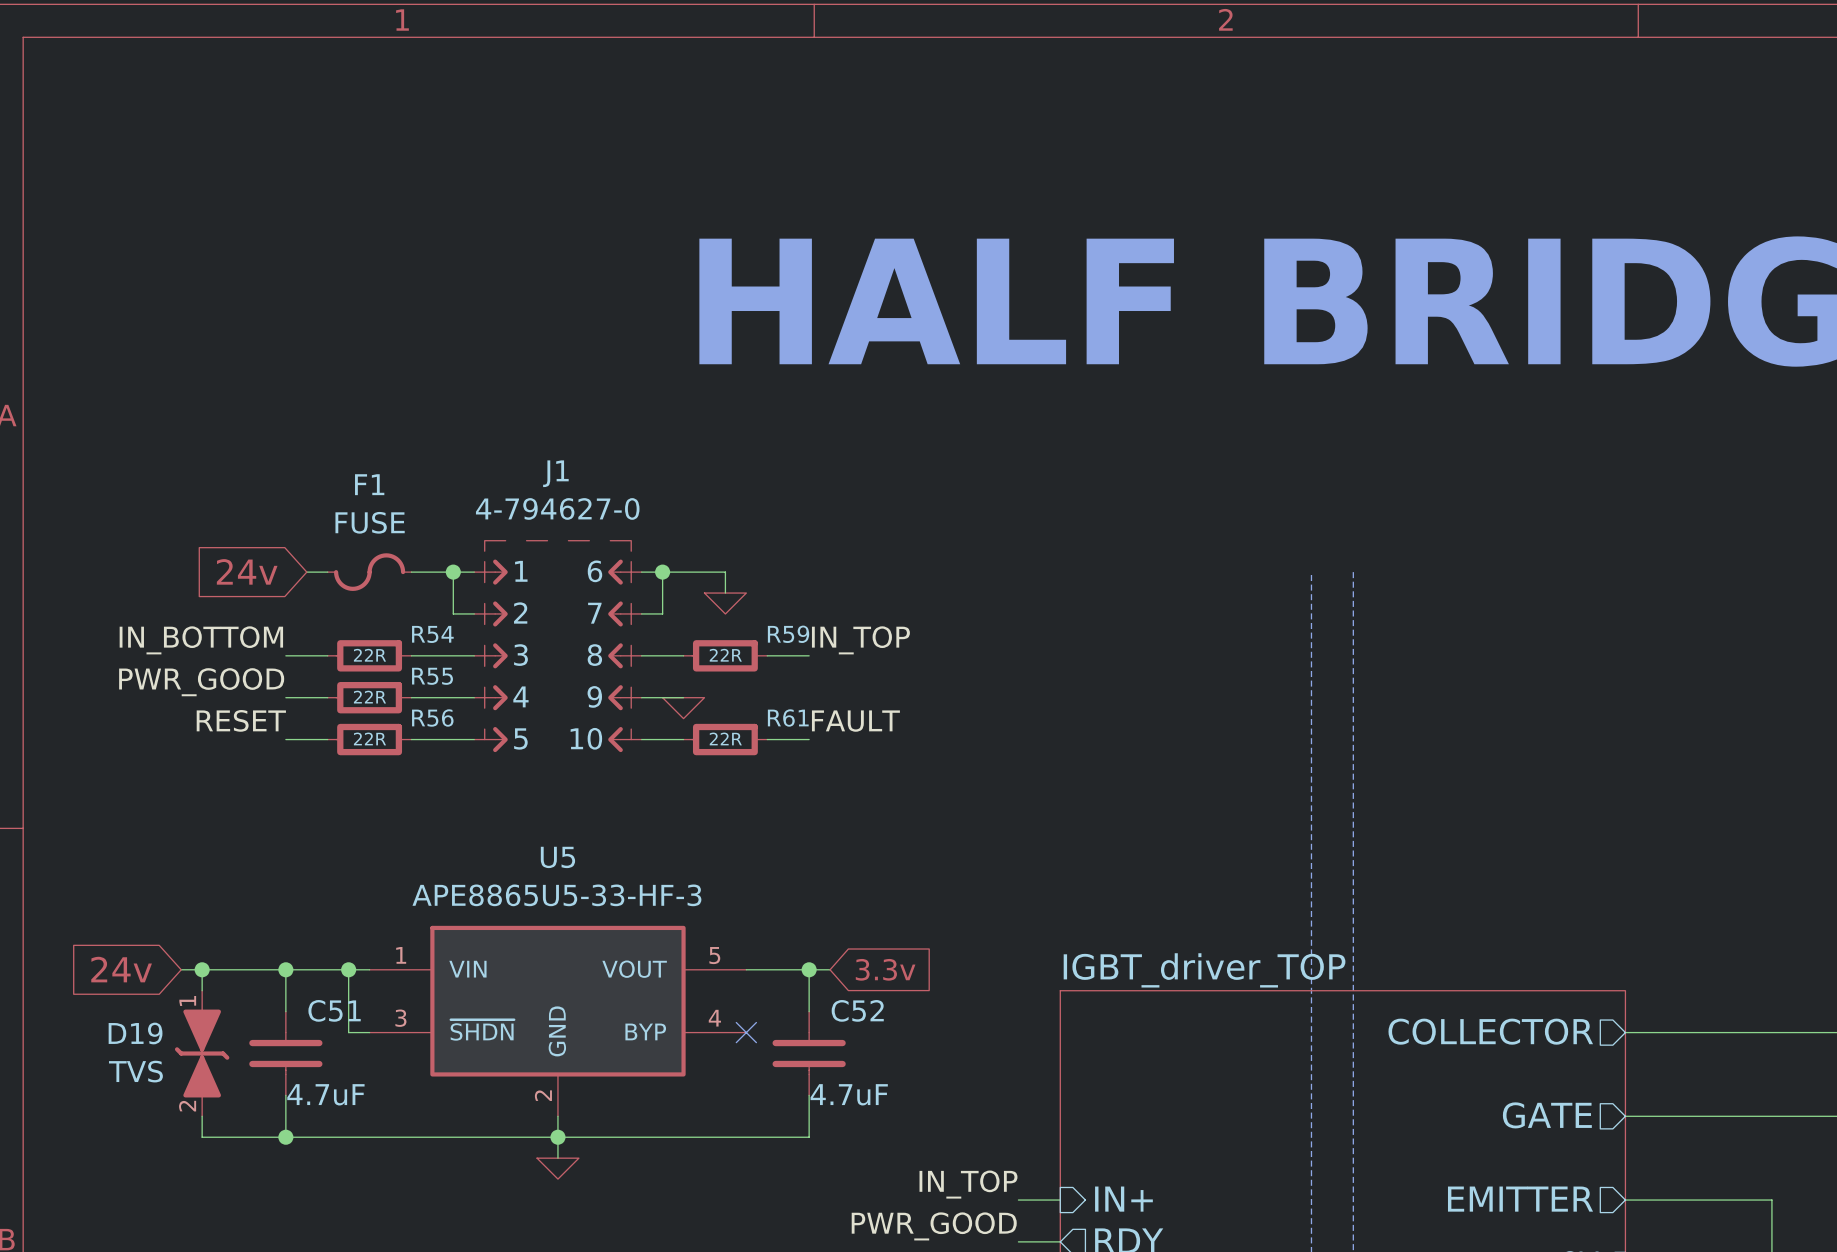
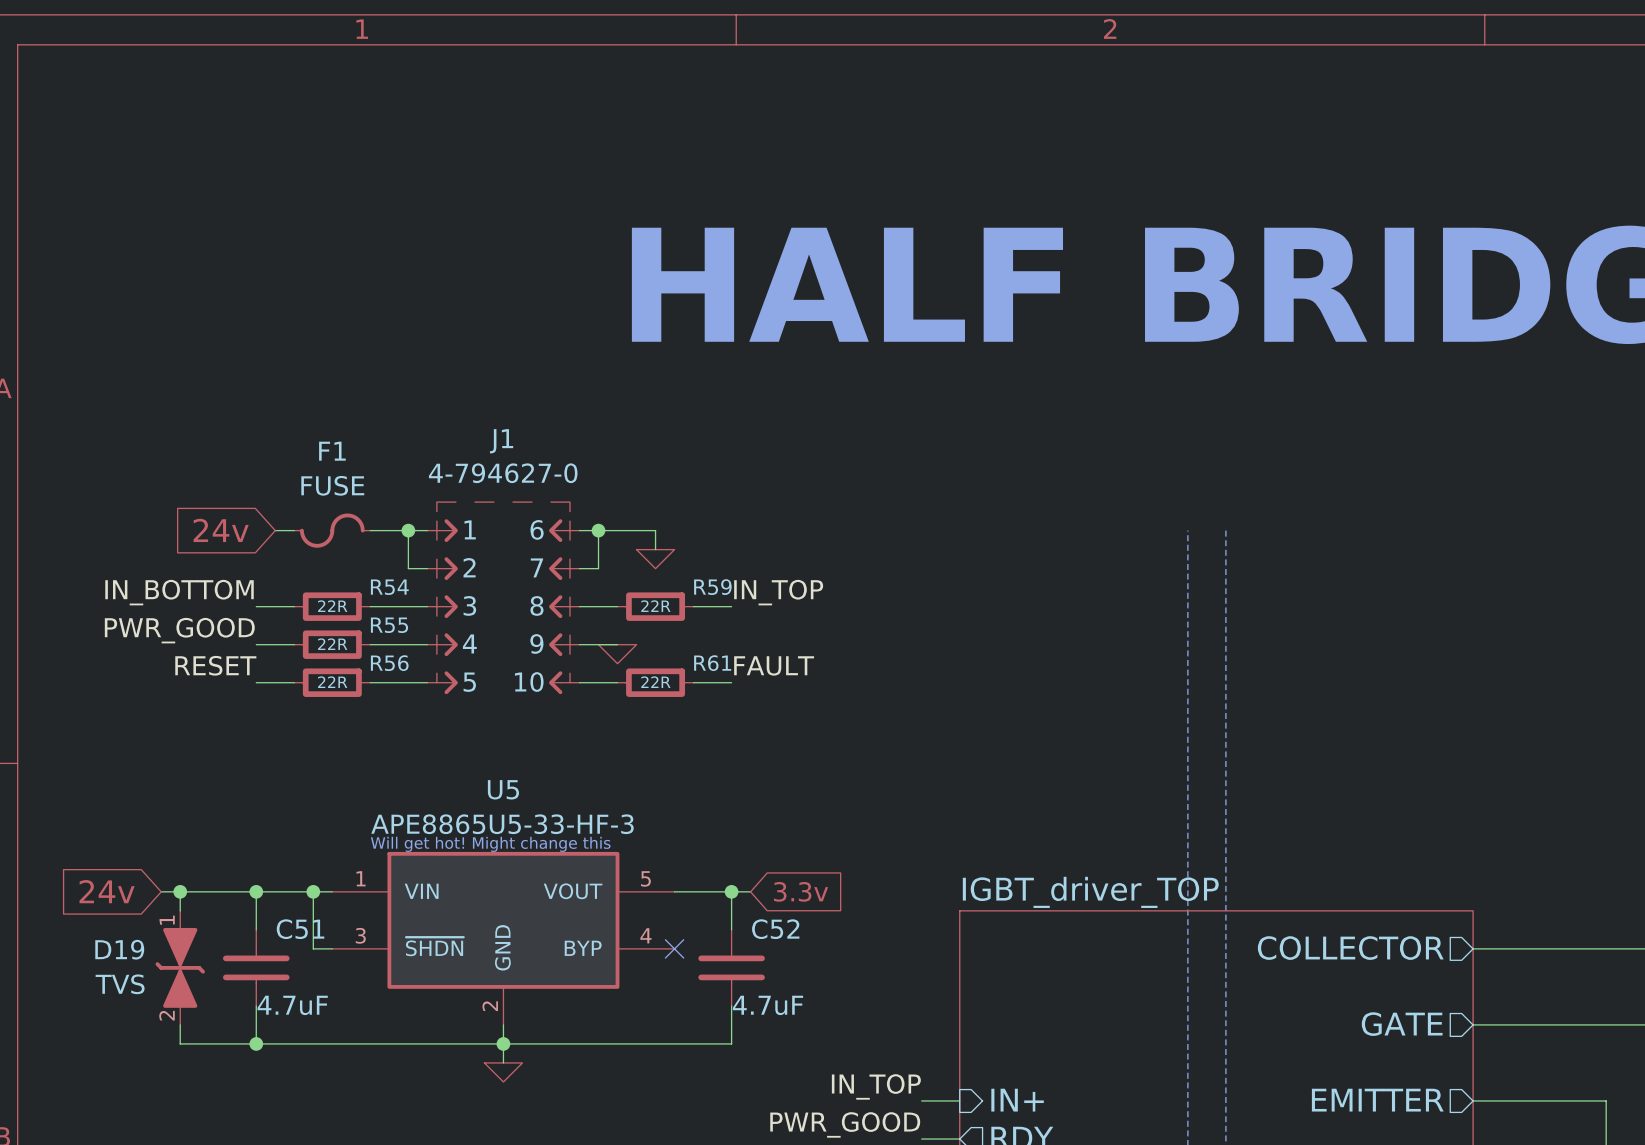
text: none -> Will get hot! Might change this (490, 844)

